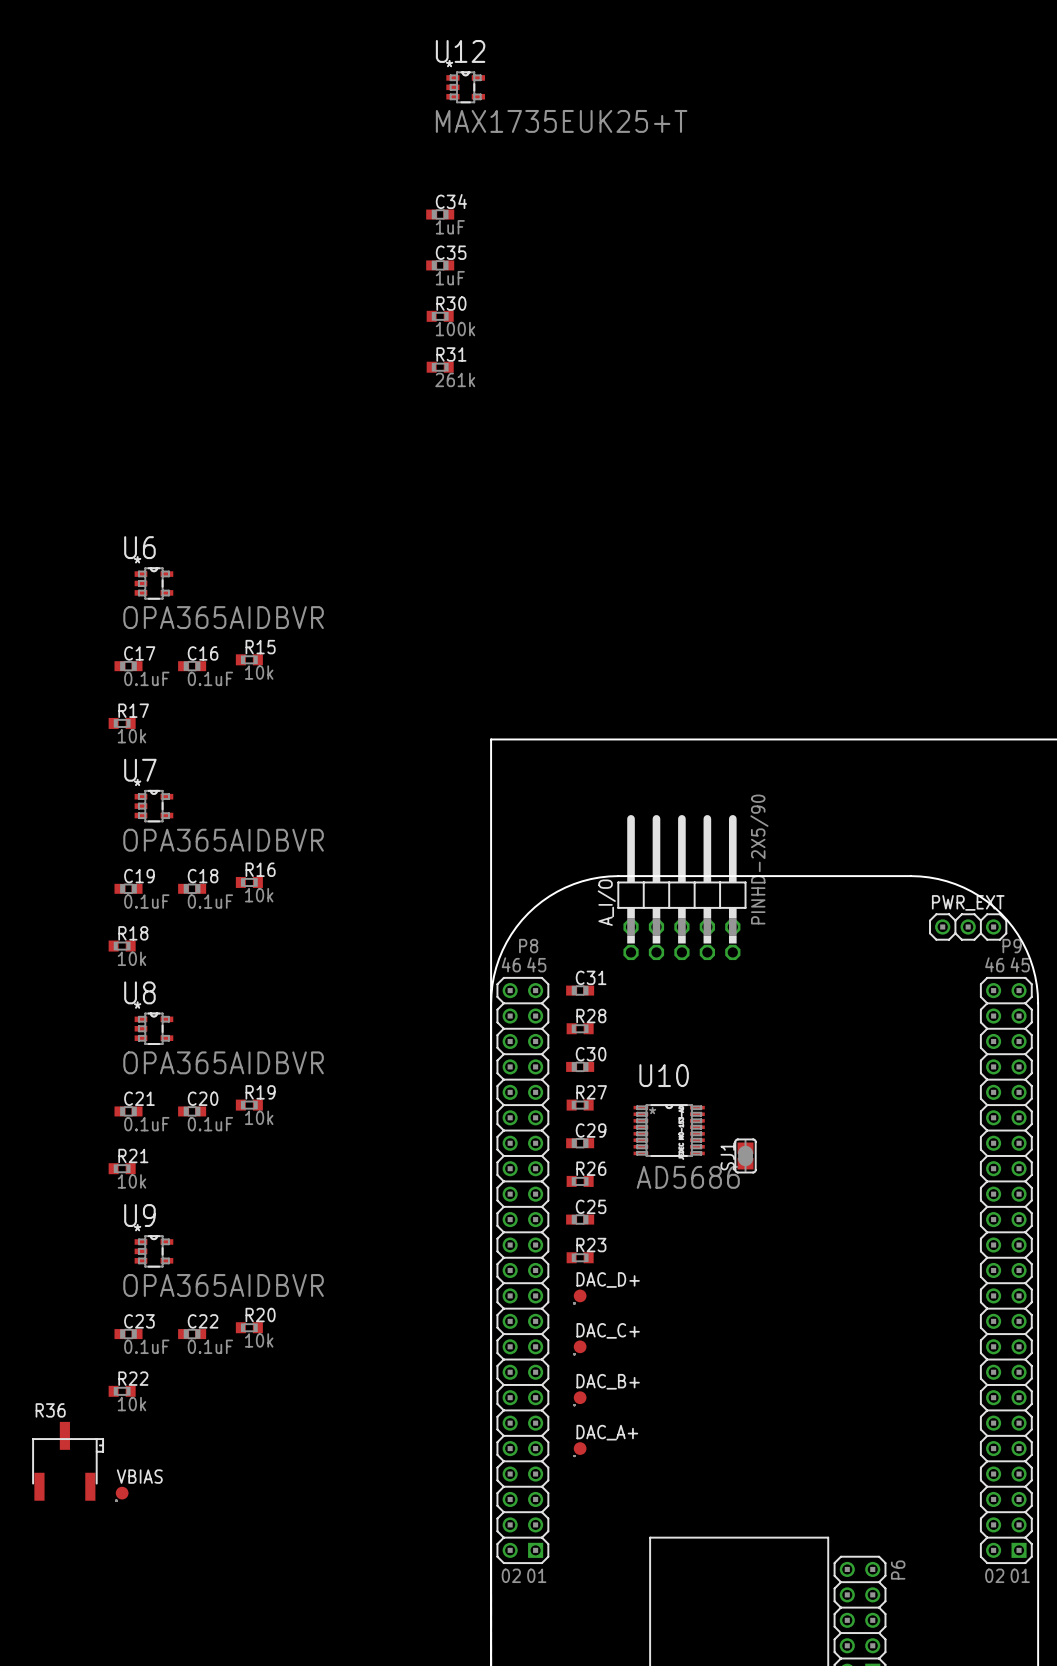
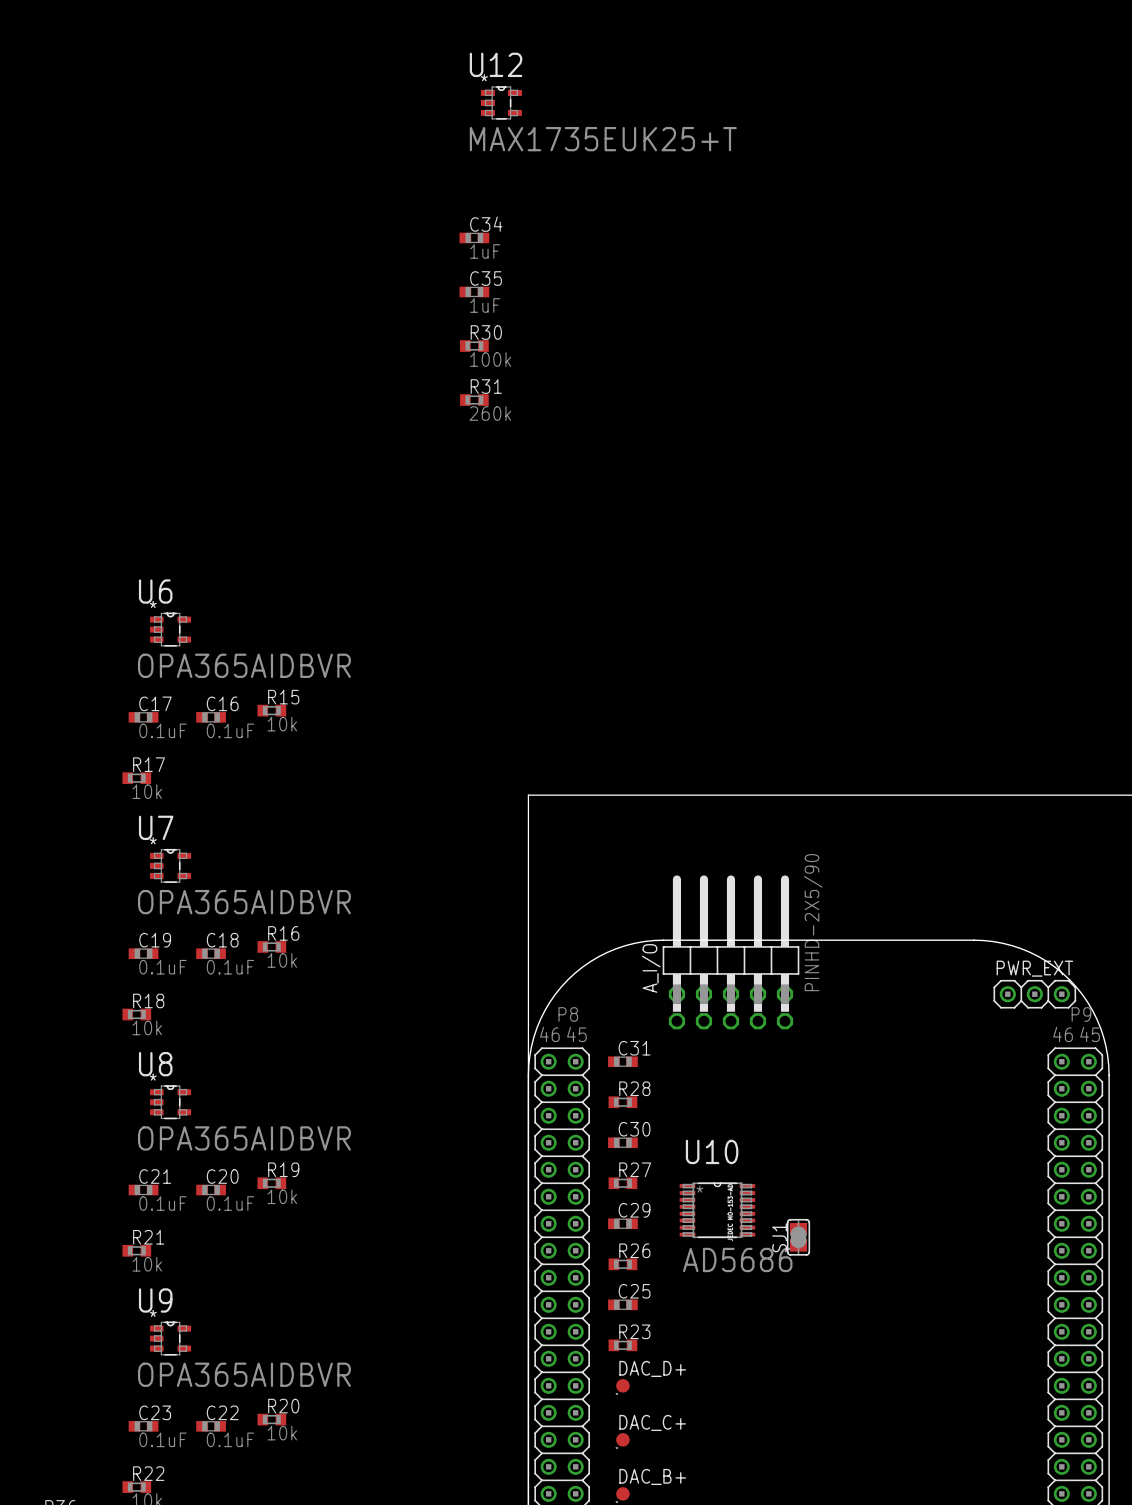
R31 value: 261k (455, 379) -> 260k (490, 413)

